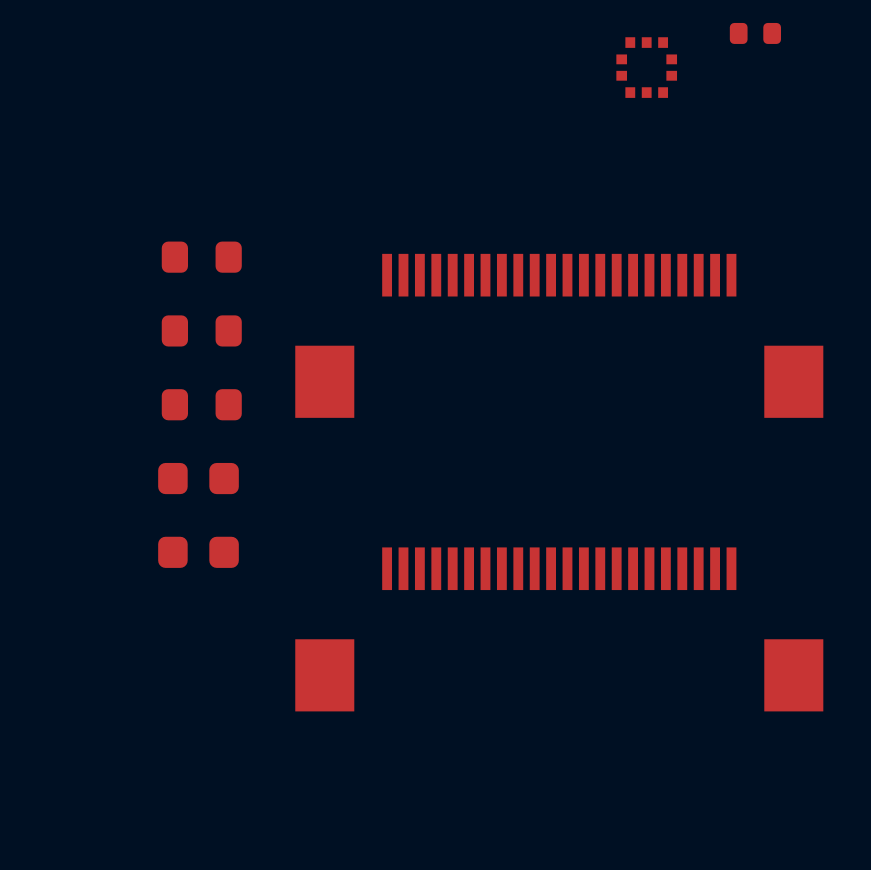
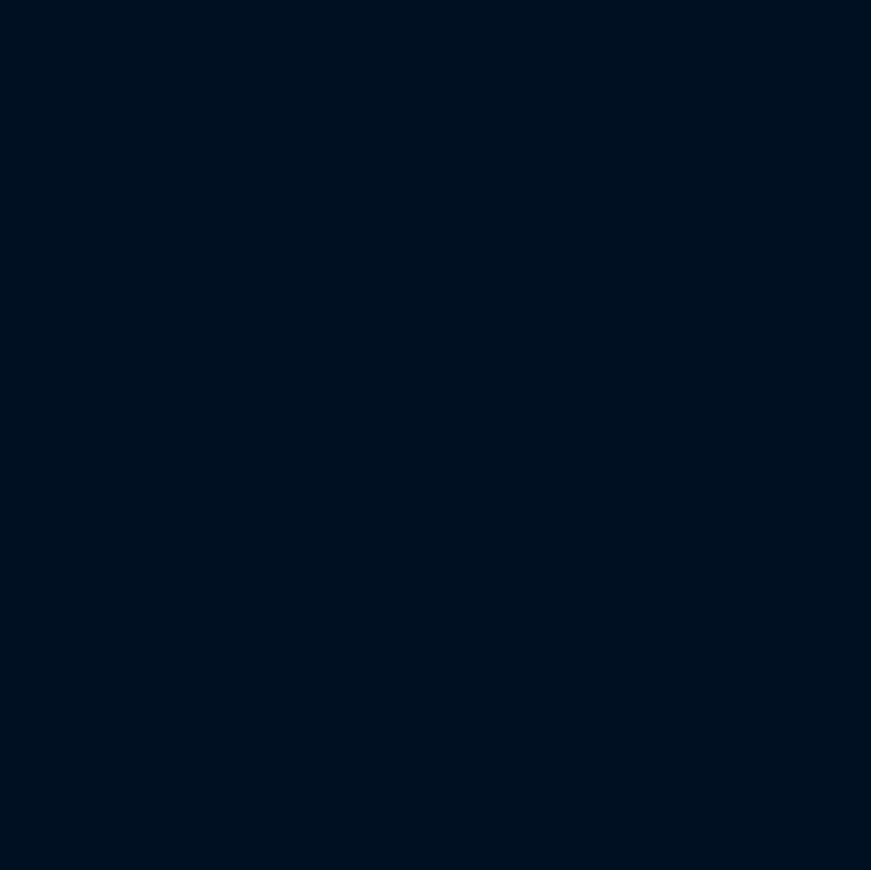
part: (755, 33) -> none
part: (646, 67) -> none
part: (201, 257) -> none
part: (201, 330) -> none
part: (559, 335) -> none
part: (201, 404) -> none
part: (198, 478) -> none
part: (198, 552) -> none
part: (559, 629) -> none

